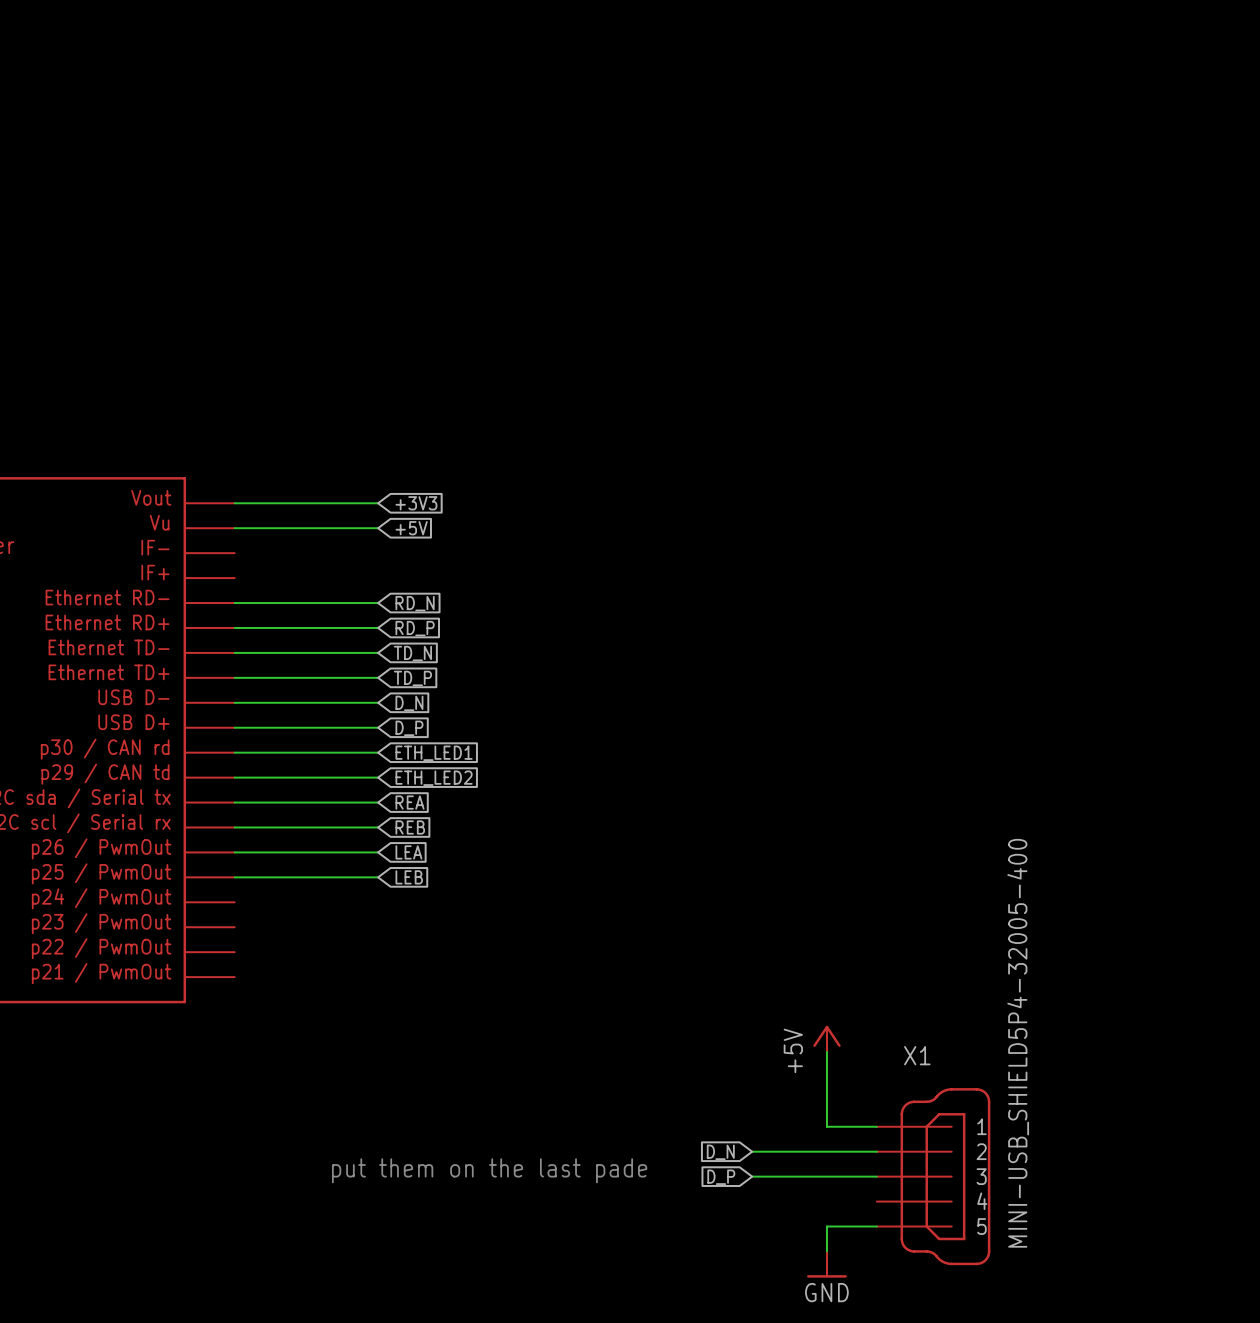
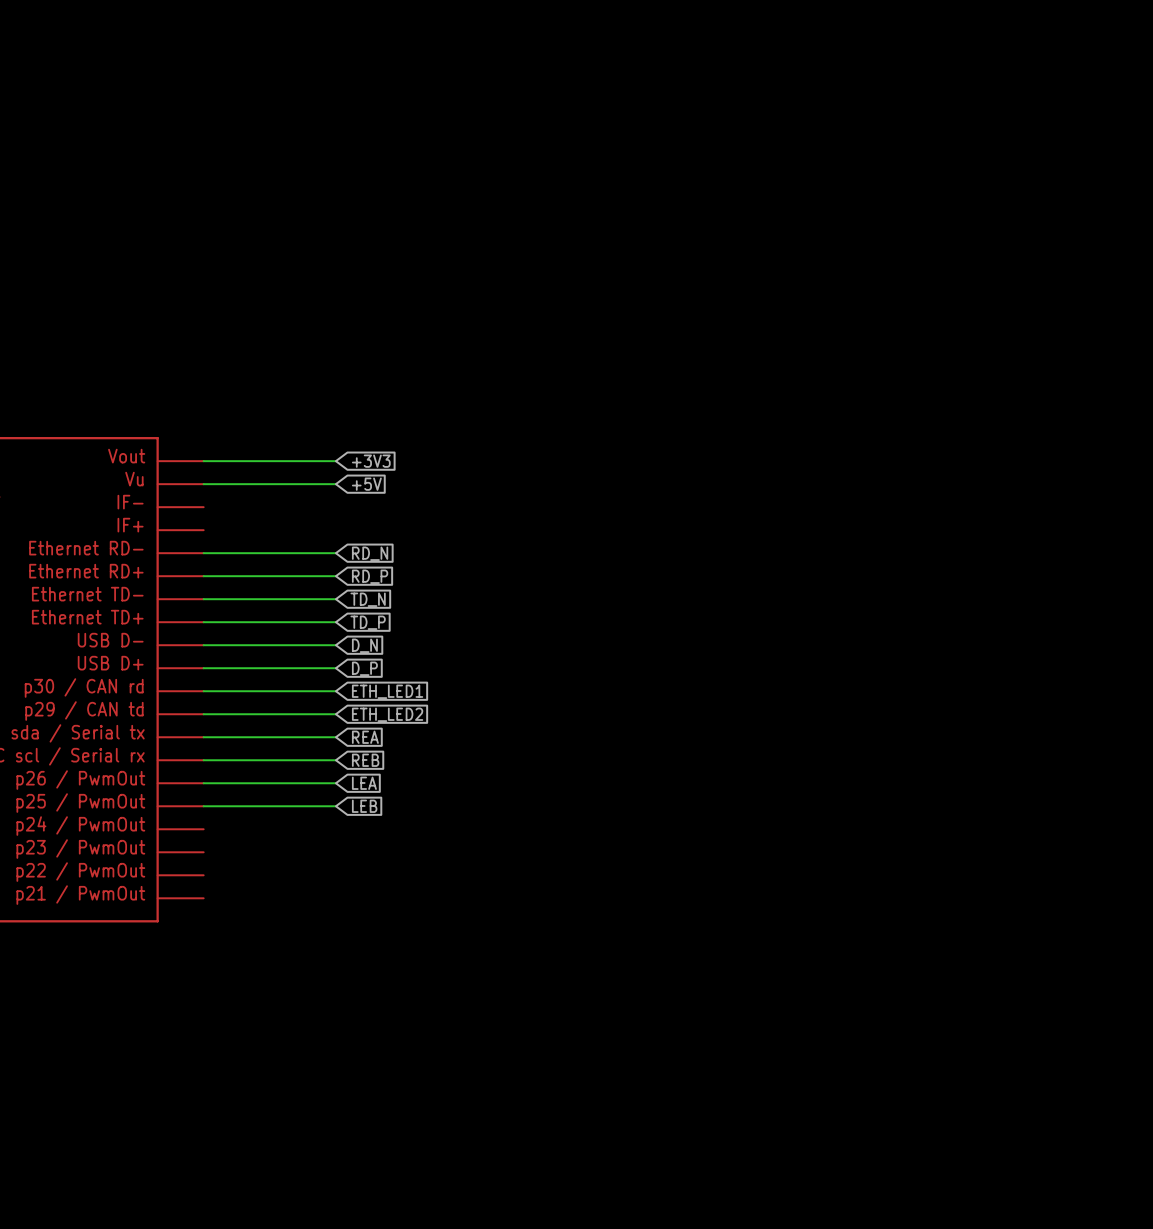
power symbol: +5V (826, 1038) -> none
wire: (826, 1051) (826, 1126) (876, 1126) -> none
wire: (752, 1151) (876, 1151) -> none
global label: D_N (720, 1152) -> none
text: put them on the last pade (489, 1170) -> none
wire: (752, 1176) (876, 1176) -> none
X1: MINI-USB_SHIELD5P4-32005-400 (933, 1176) -> none
global label: D_P (721, 1177) -> none
wire: (876, 1226) (826, 1226) (826, 1251) -> none
power symbol: GND (826, 1264) -> none

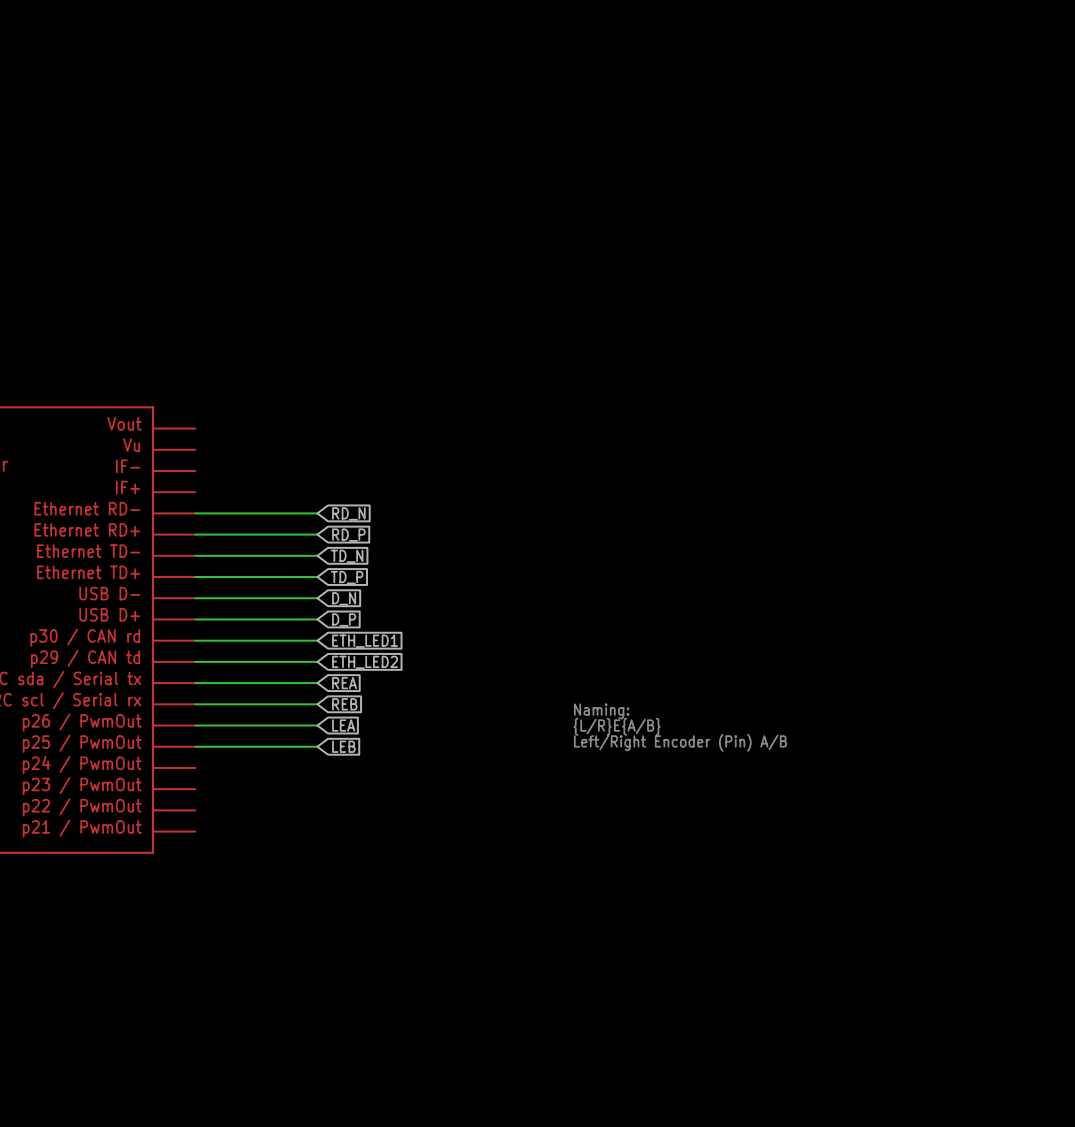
wire: (203, 461) (335, 461) -> none
global label: +3V3 (371, 461) -> none
wire: (203, 484) (335, 484) -> none
global label: +5V (366, 484) -> none
text: none -> Naming: (601, 711)
text: none -> {L/R}E{A/B} (617, 726)
text: none -> Left/Right Encoder (Pin) A/B (680, 742)

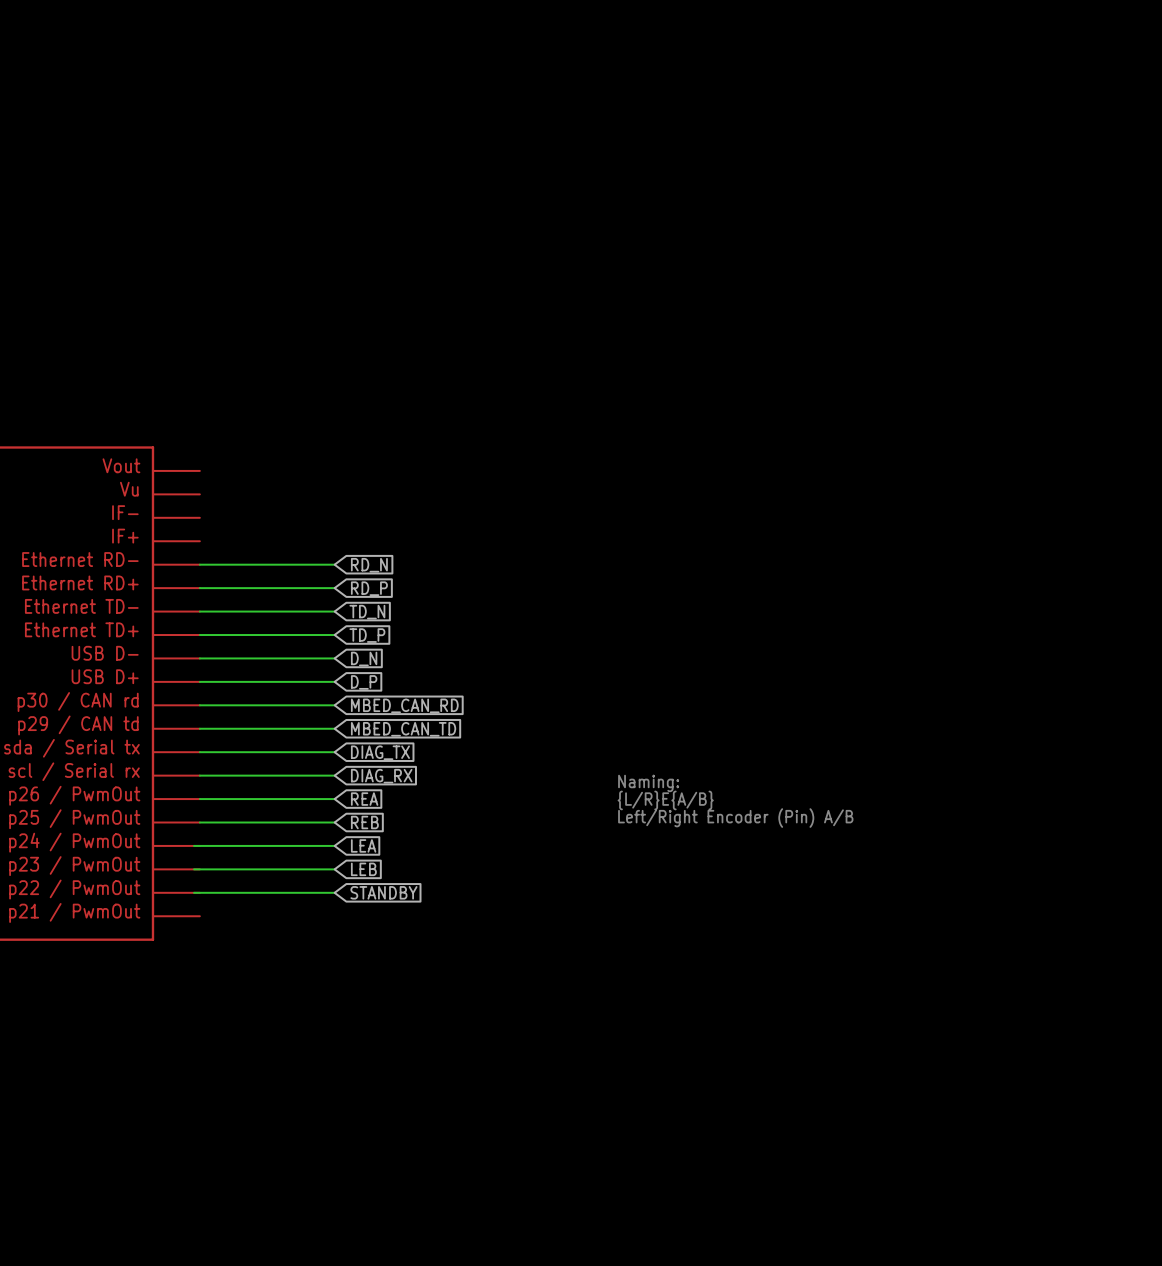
global label: ETH_LED1 (365, 641) -> MBED_CAN_RD (404, 705)
global label: ETH_LED2 (365, 662) -> MBED_CAN_TD (403, 729)
global label: REA (344, 683) -> DIAG_TX (380, 752)
global label: REB (344, 704) -> DIAG_RX (381, 776)
global label: LEA (343, 725) -> REA (364, 799)
global label: LEB (343, 746) -> REB (364, 822)
wire: none -> (194, 845) (334, 845)
global label: none -> LEA (363, 845)
wire: none -> (194, 869) (334, 869)
global label: none -> LEB (363, 869)
wire: none -> (194, 892) (334, 892)
global label: none -> STANDBY (383, 892)

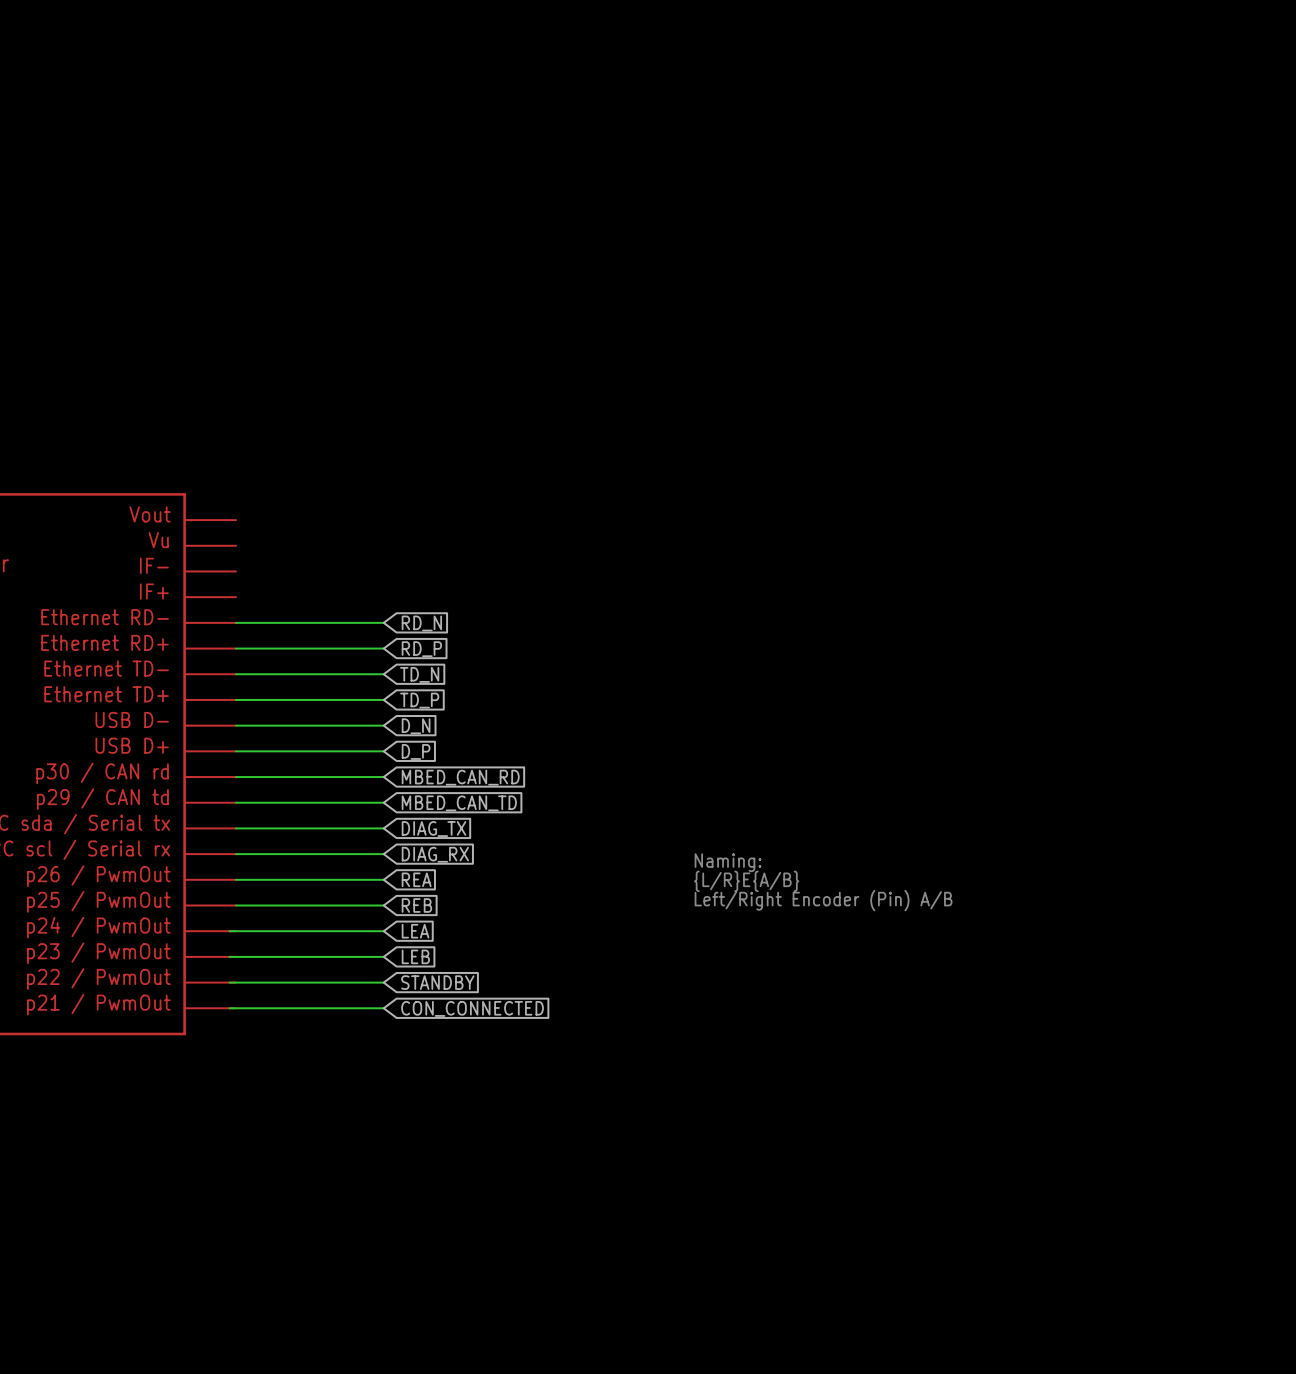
wire: none -> (229, 1008) (383, 1008)
global label: none -> CON_CONNECTED (472, 1008)

